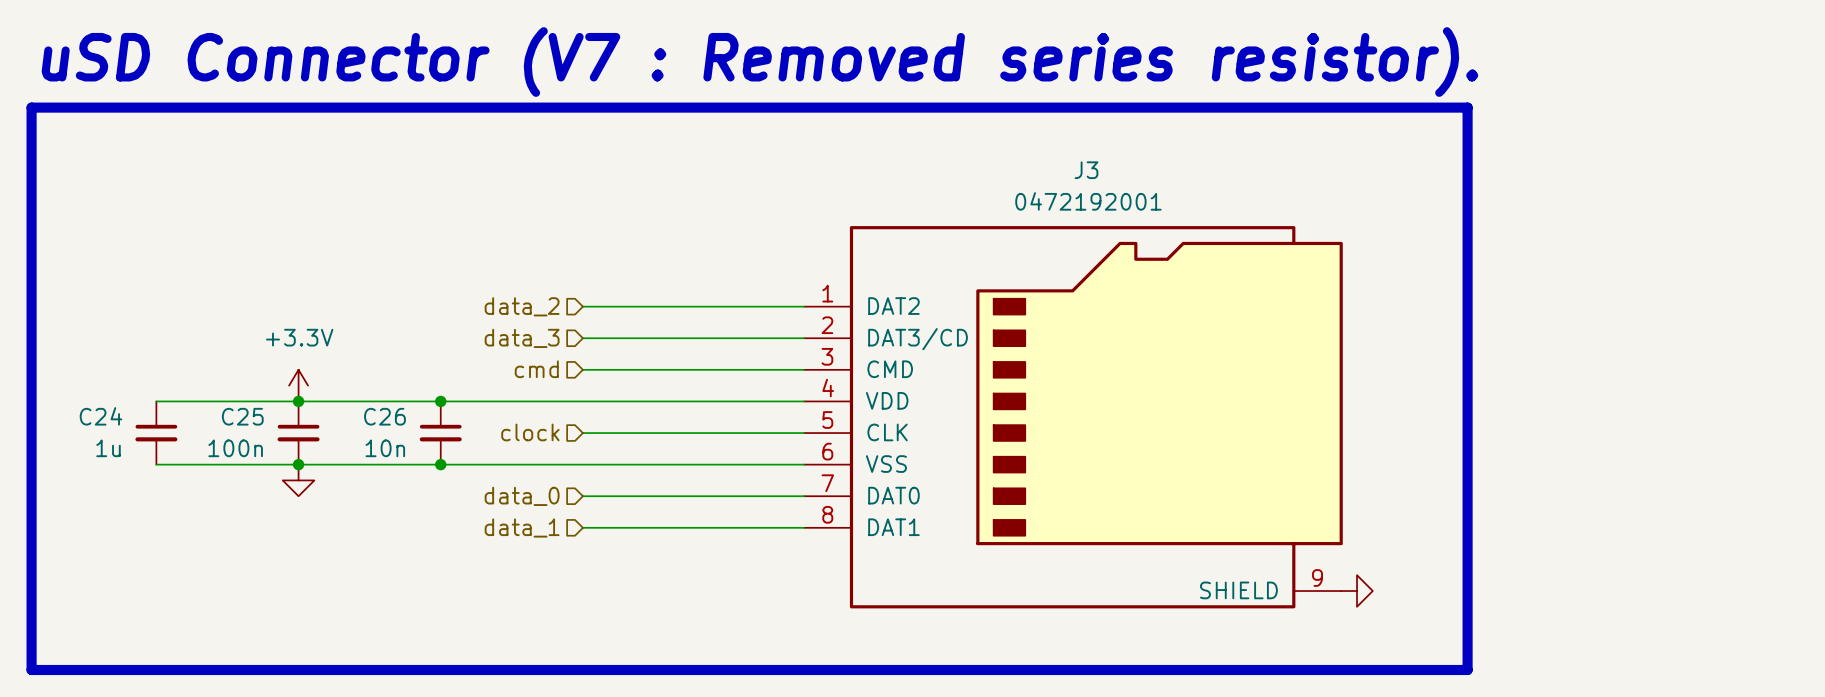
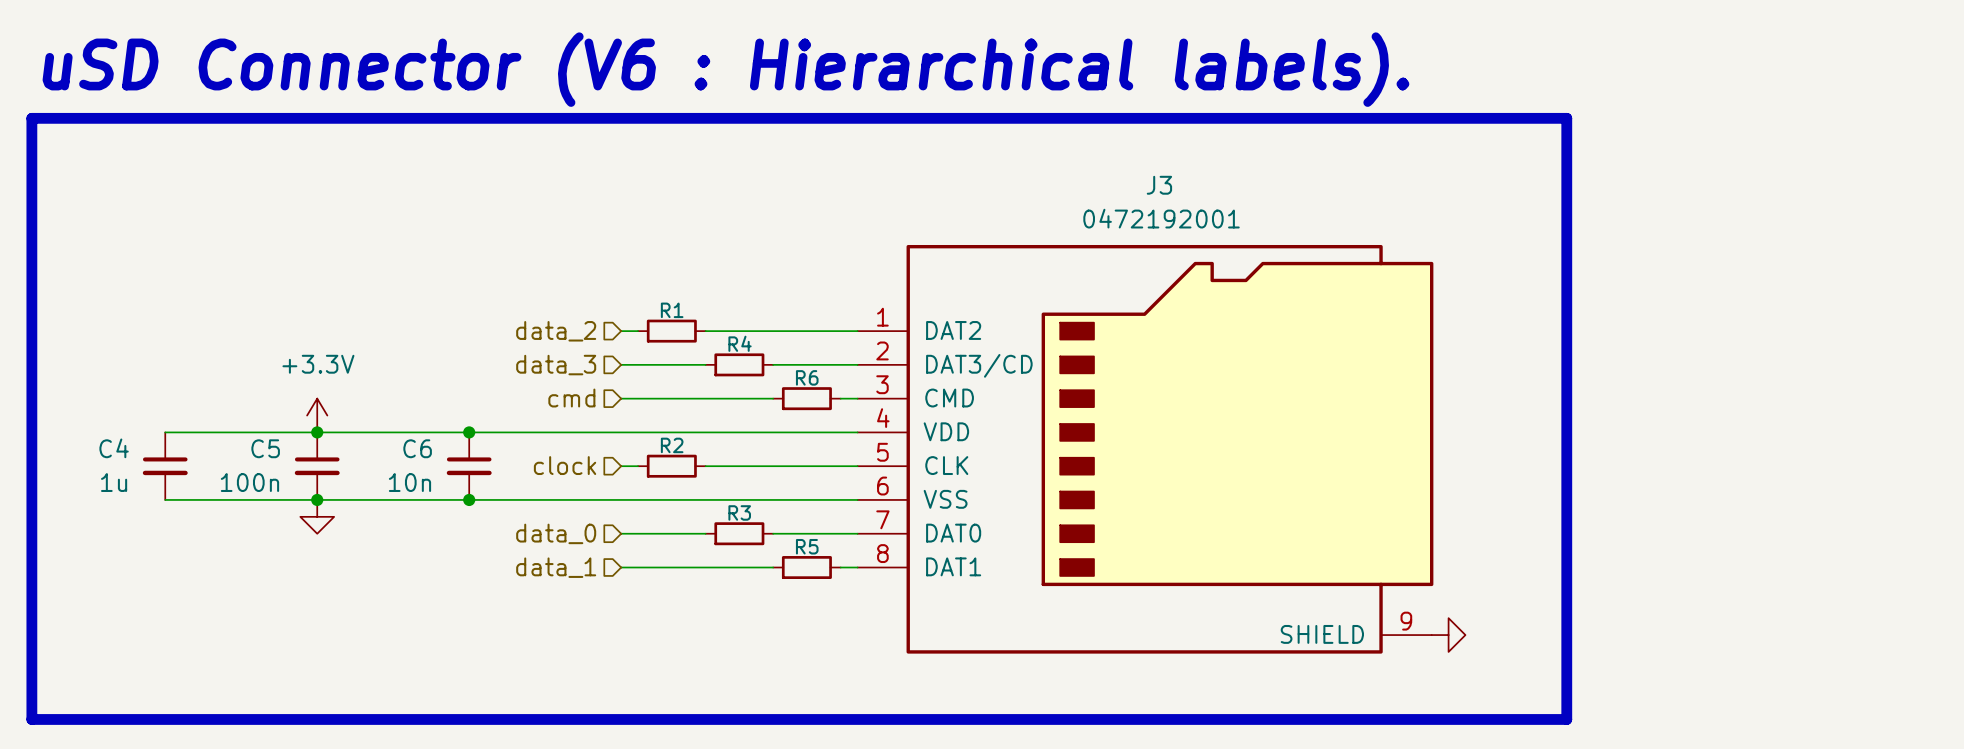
text: uSD Connector (V7 : Removed series resistor). (759, 62) -> uSD Connector (V6 : Hierarchical labels). (725, 69)
wire: (598, 306) (661, 306) -> none
R1: none -> (671, 331)
wire: (661, 338) (725, 338) -> none
R4: none -> (739, 364)
wire: (725, 369) (788, 369) -> none
R6: none -> (806, 398)
C24 name: C24 (100, 416) -> C4 (114, 448)
C25 name: C25 (242, 416) -> C5 (265, 448)
C26 name: C26 (384, 416) -> C6 (417, 448)
wire: (598, 433) (661, 433) -> none
R2: none -> (671, 466)
wire: (661, 496) (725, 496) -> none
R3: none -> (739, 533)
wire: (725, 527) (788, 527) -> none
R5: none -> (806, 567)

